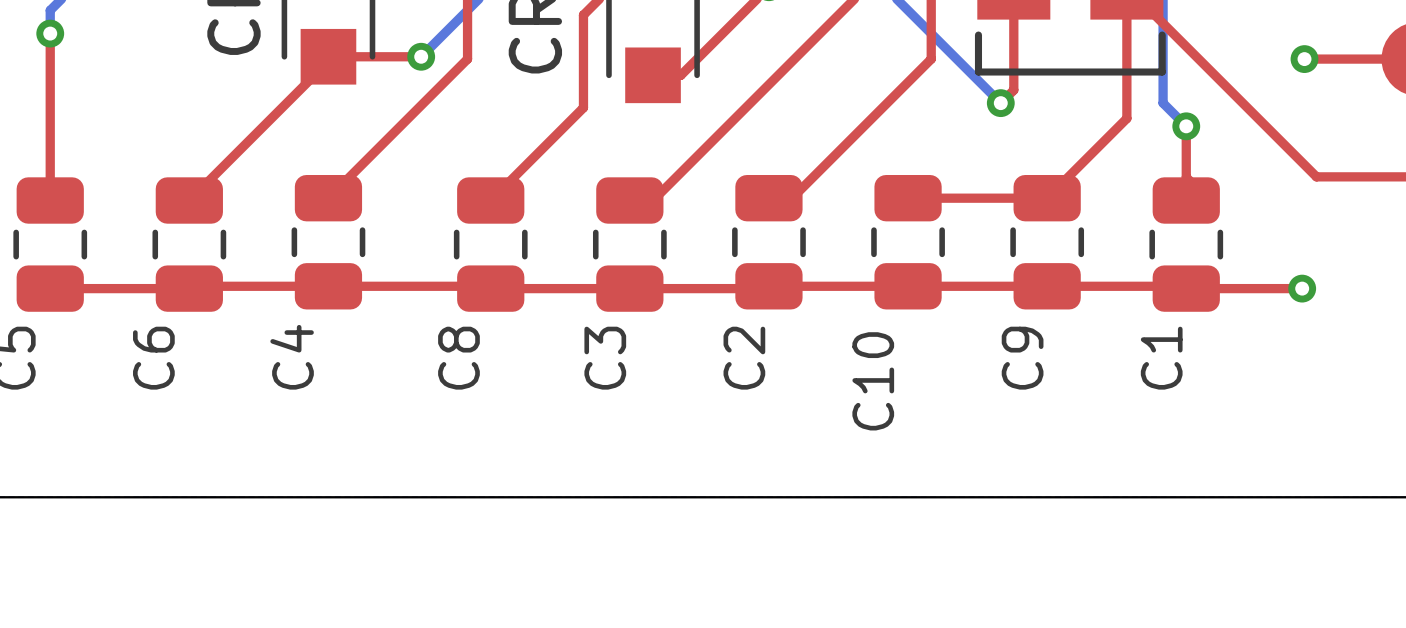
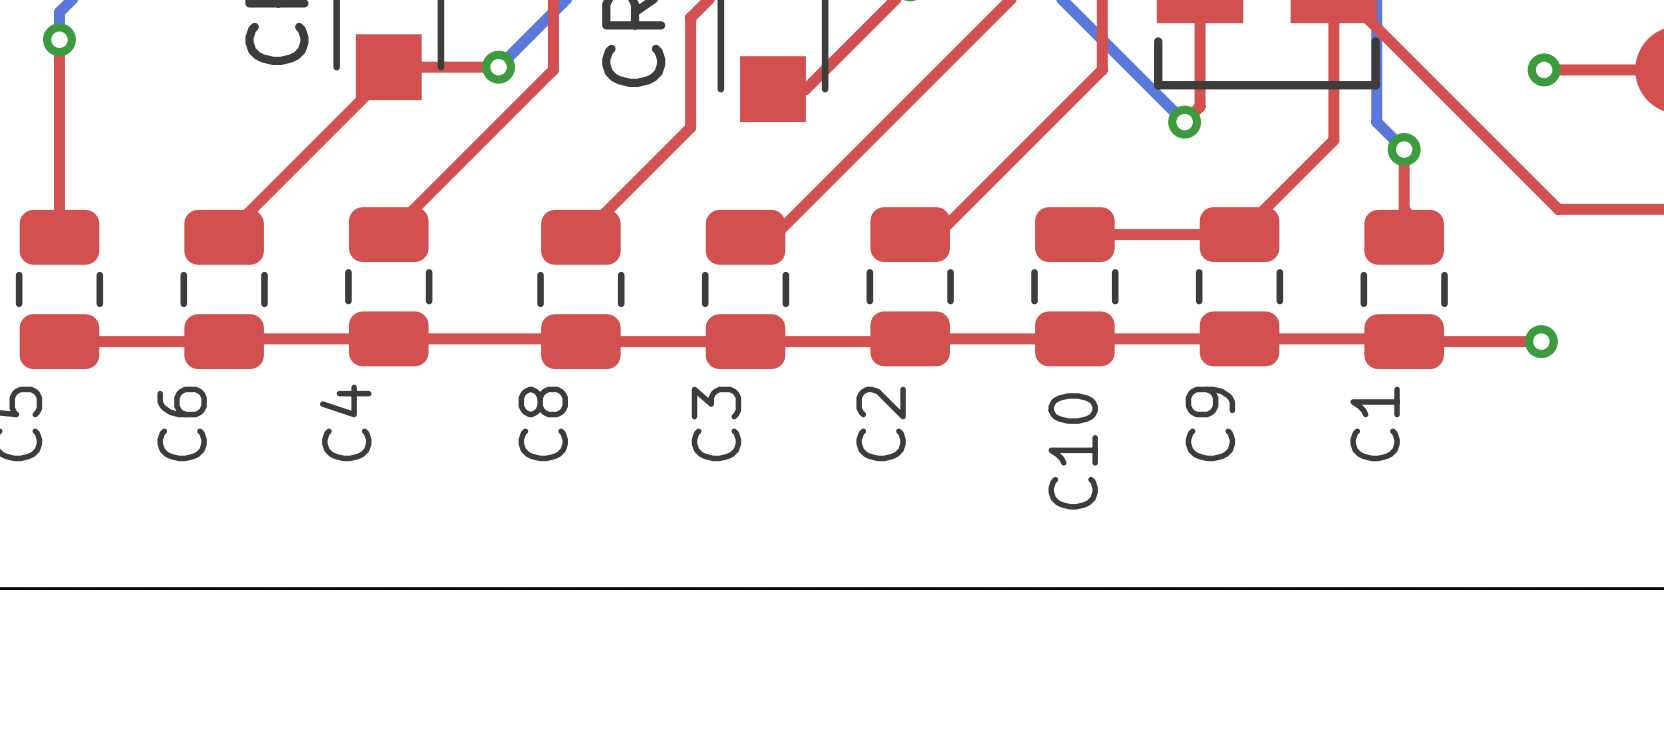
C10 name position: C10 (873, 381) -> C10 (1073, 451)

